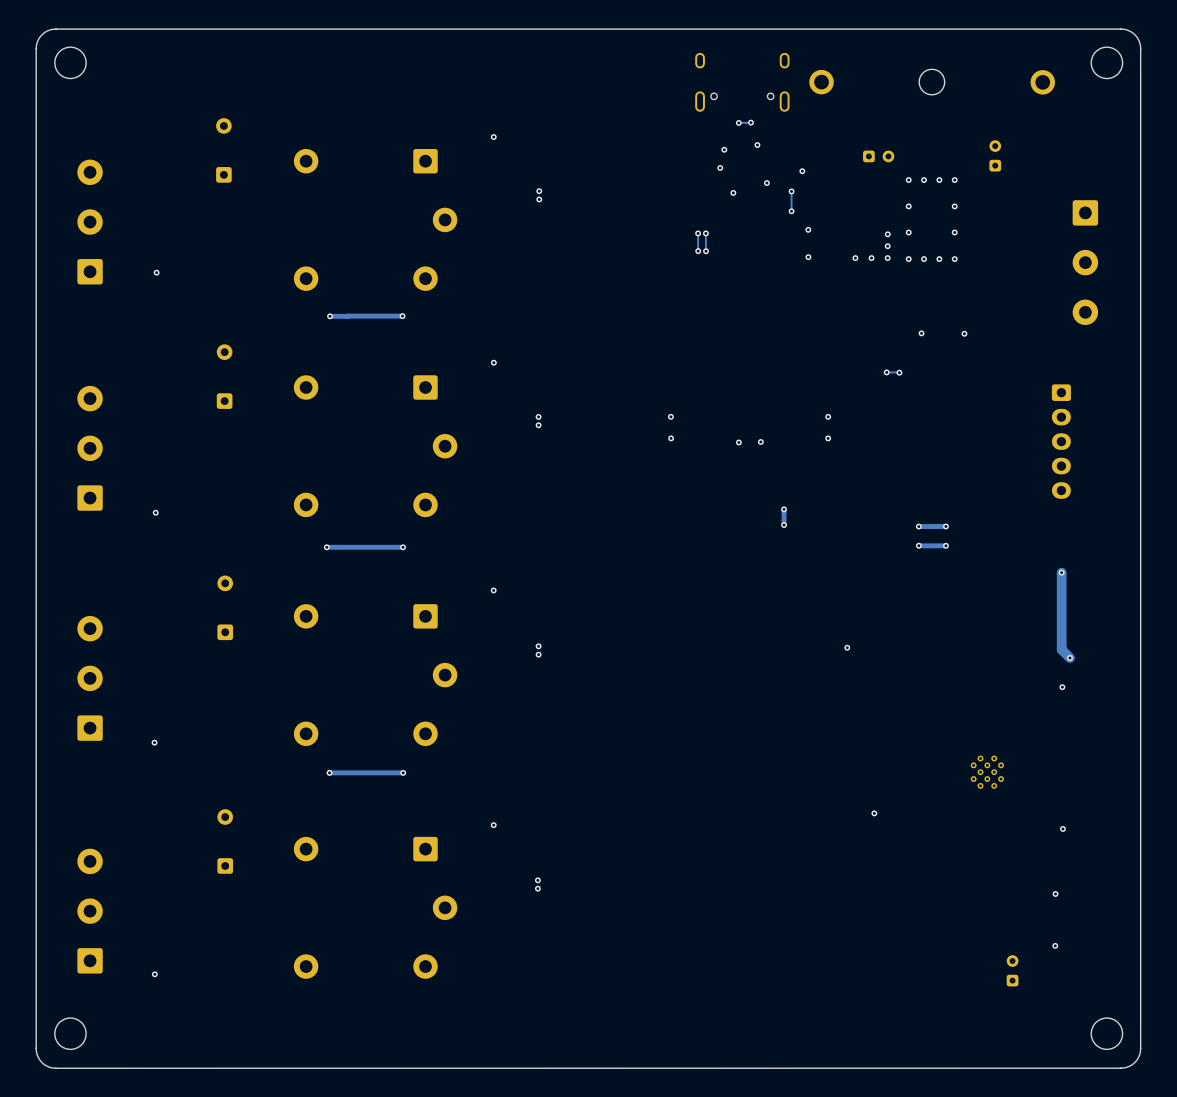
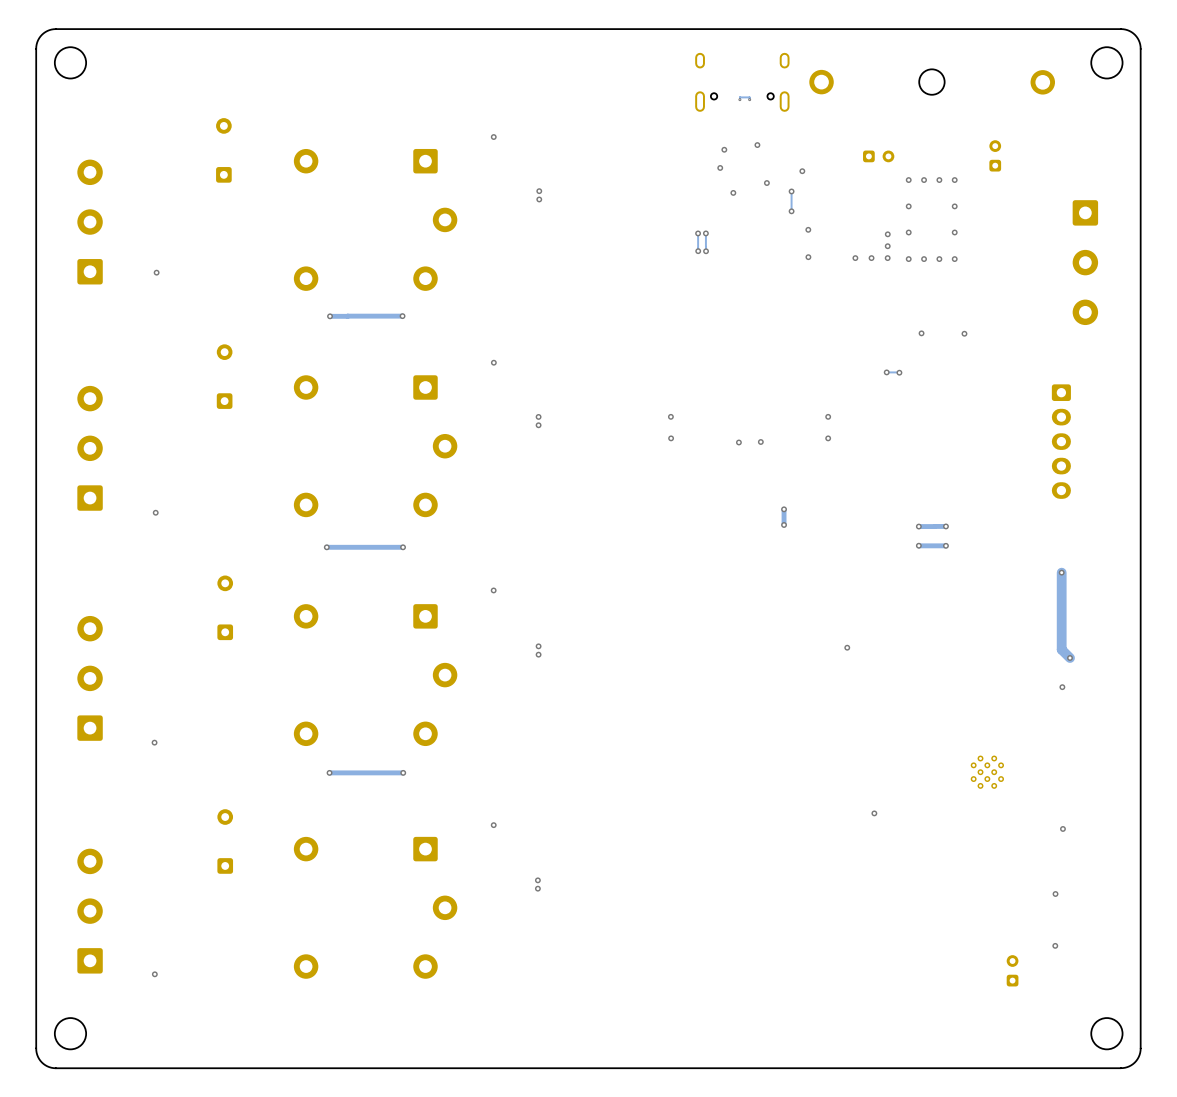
track: none -> (740, 97) (749, 97) (749, 99)
via: none -> (739, 99)
via: none -> (749, 99)
via: (738, 122) -> none
track: (749, 122) (751, 122) (738, 122) -> none
via: (750, 122) -> none

